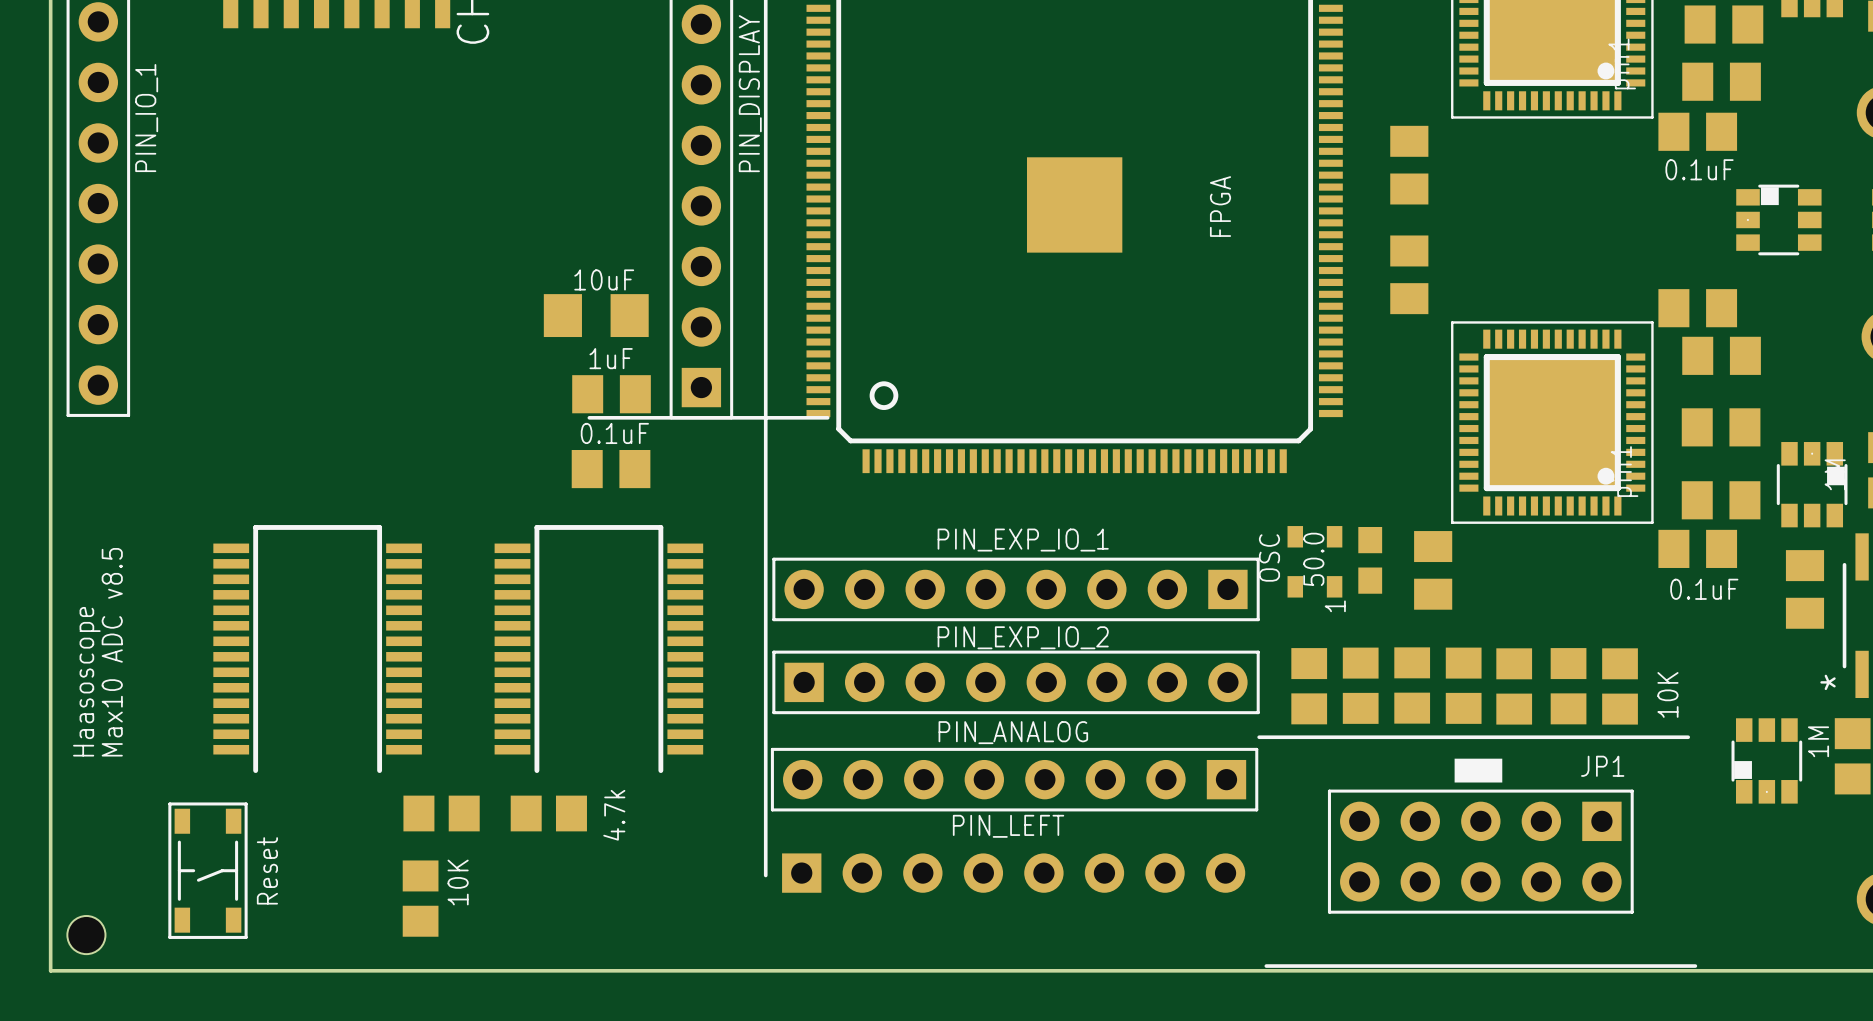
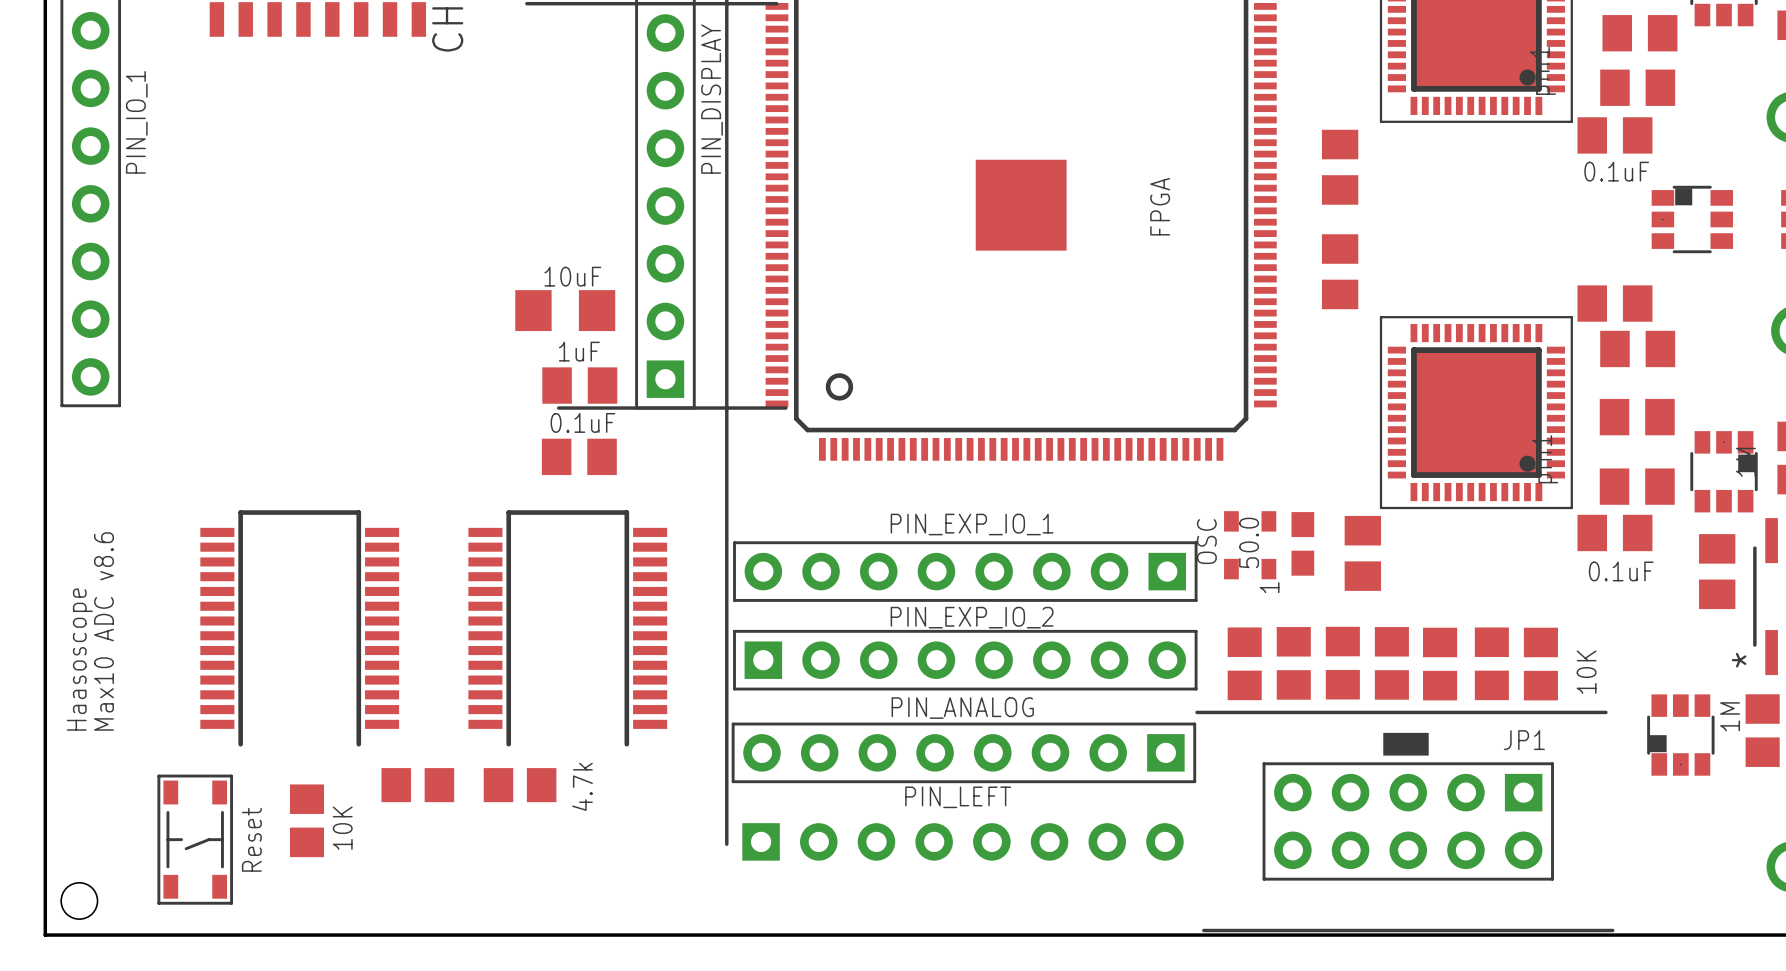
text: Max10 ADC v8.5 (112, 652) -> Max10 ADC v8.6 (103, 631)
text position: 10K (458, 882) -> 10K (342, 828)
part position: (420, 898) -> (306, 820)

